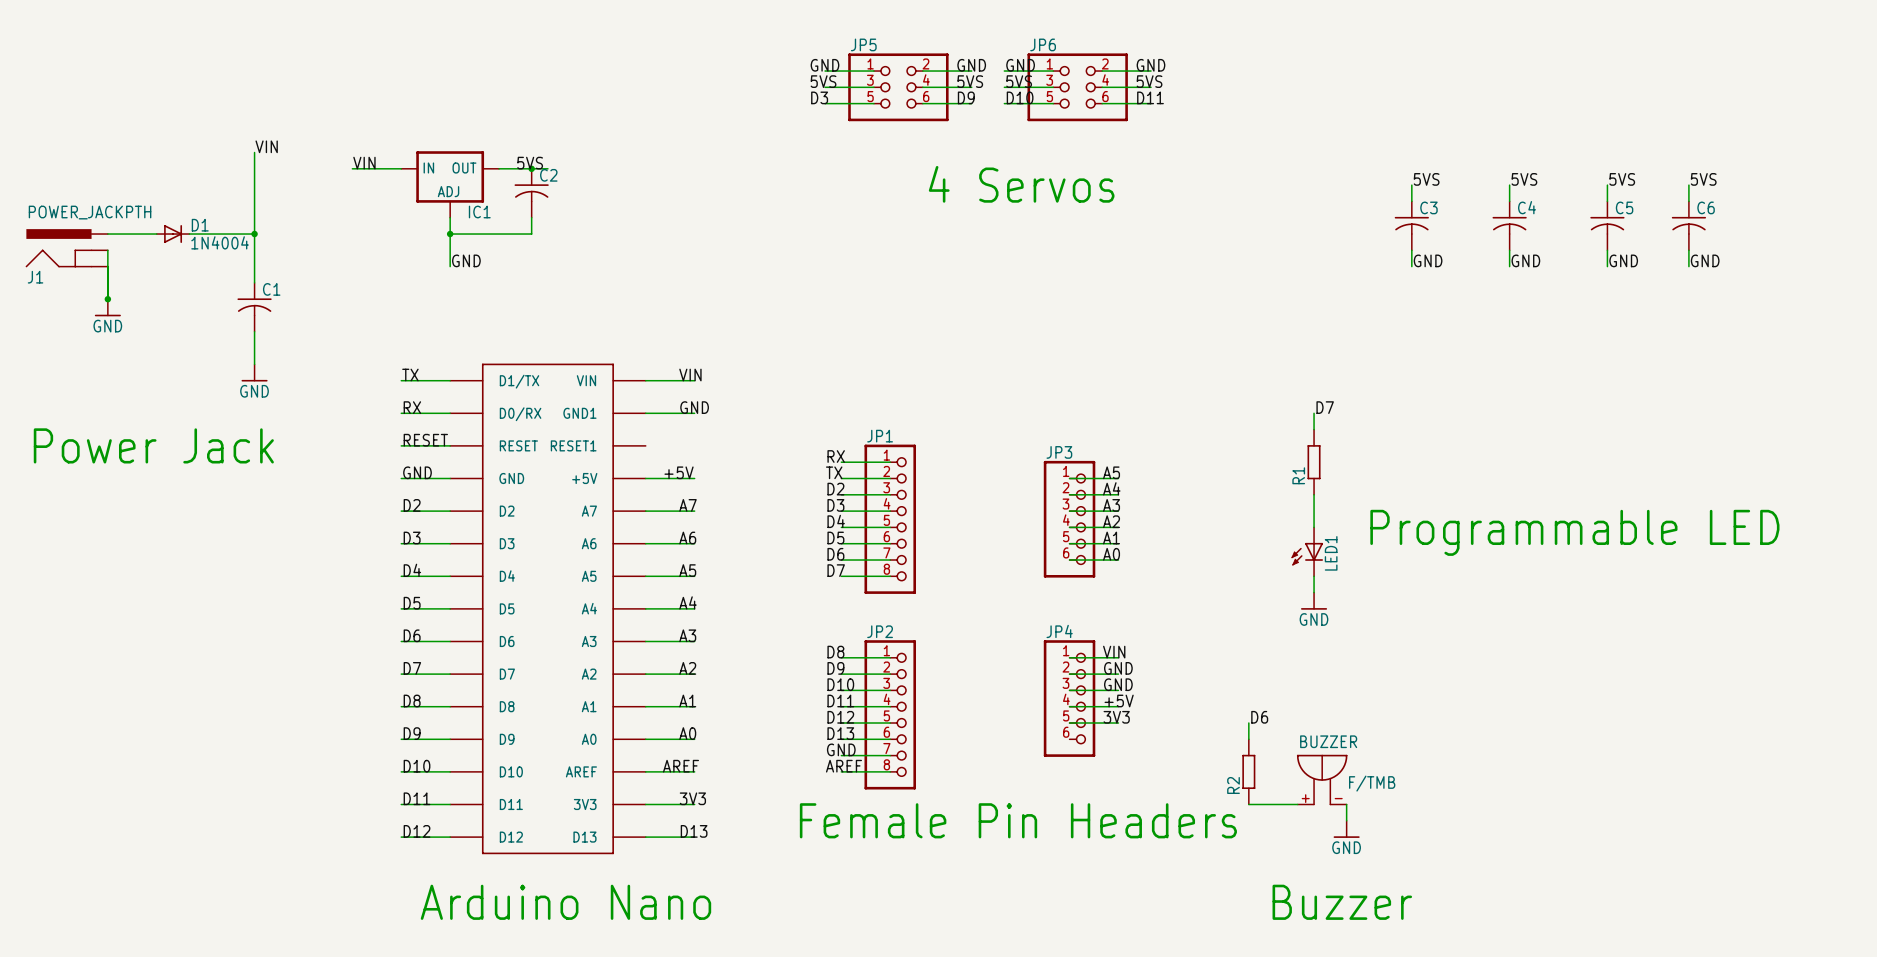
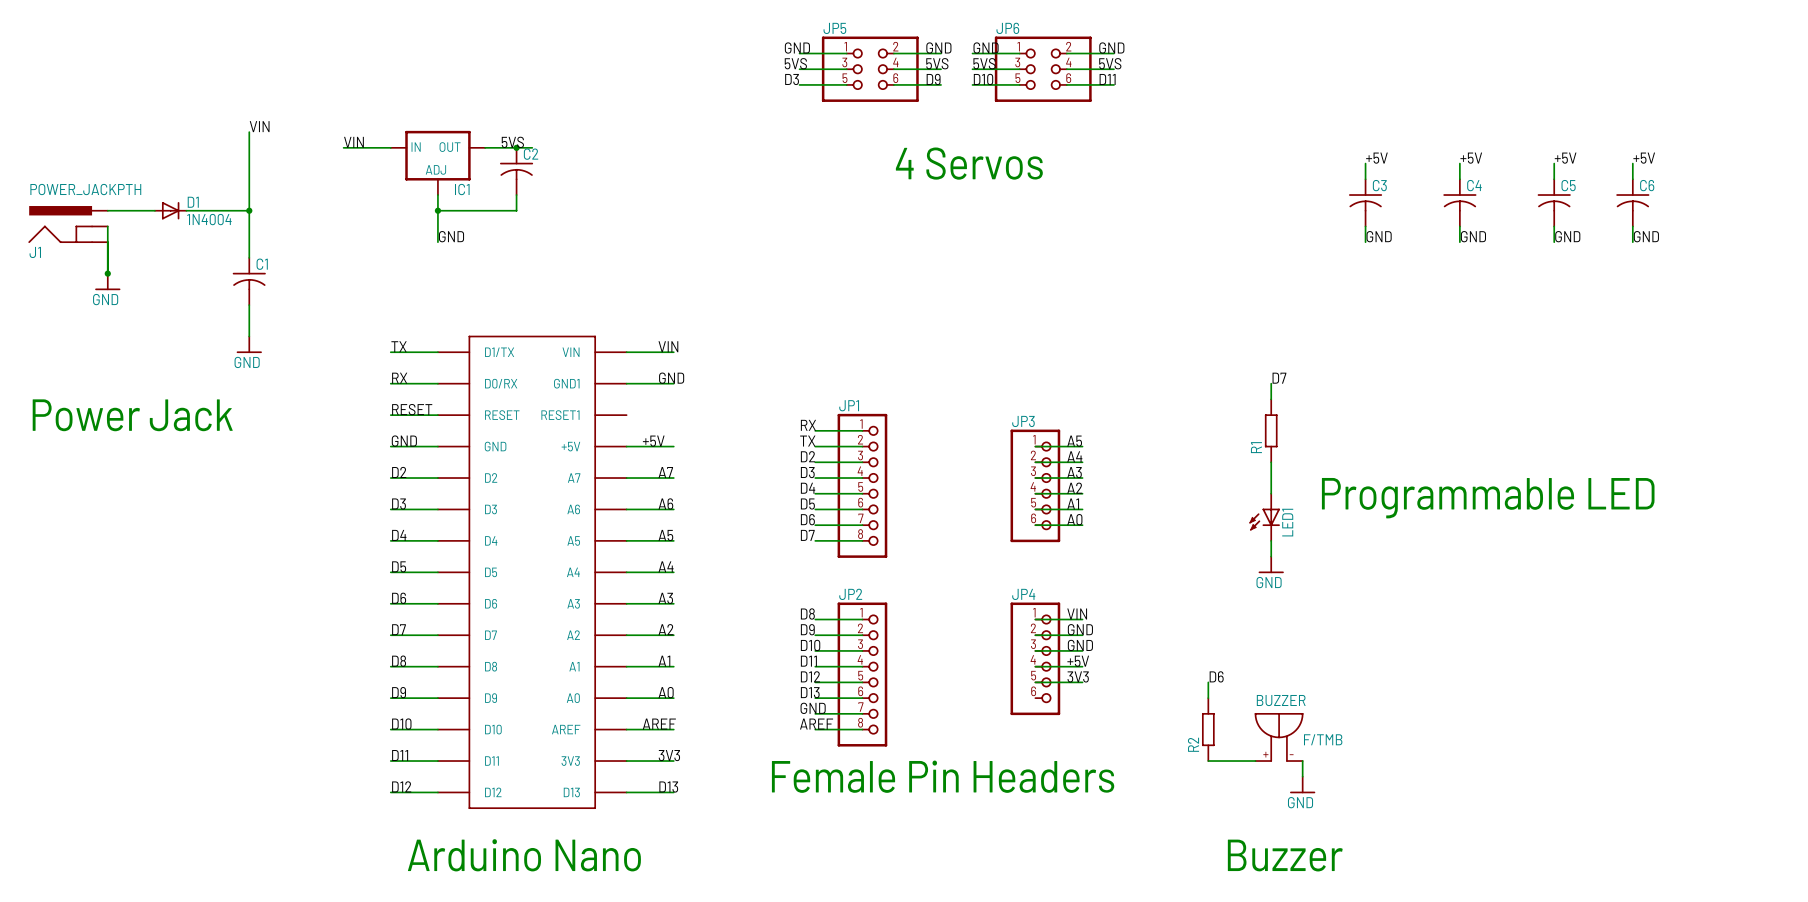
label: 5VS (1426, 179) -> +5V (1376, 158)
label: 5VS (1524, 179) -> +5V (1471, 158)
label: 5VS (1622, 179) -> +5V (1565, 158)
label: 5VS (1703, 179) -> +5V (1644, 158)

